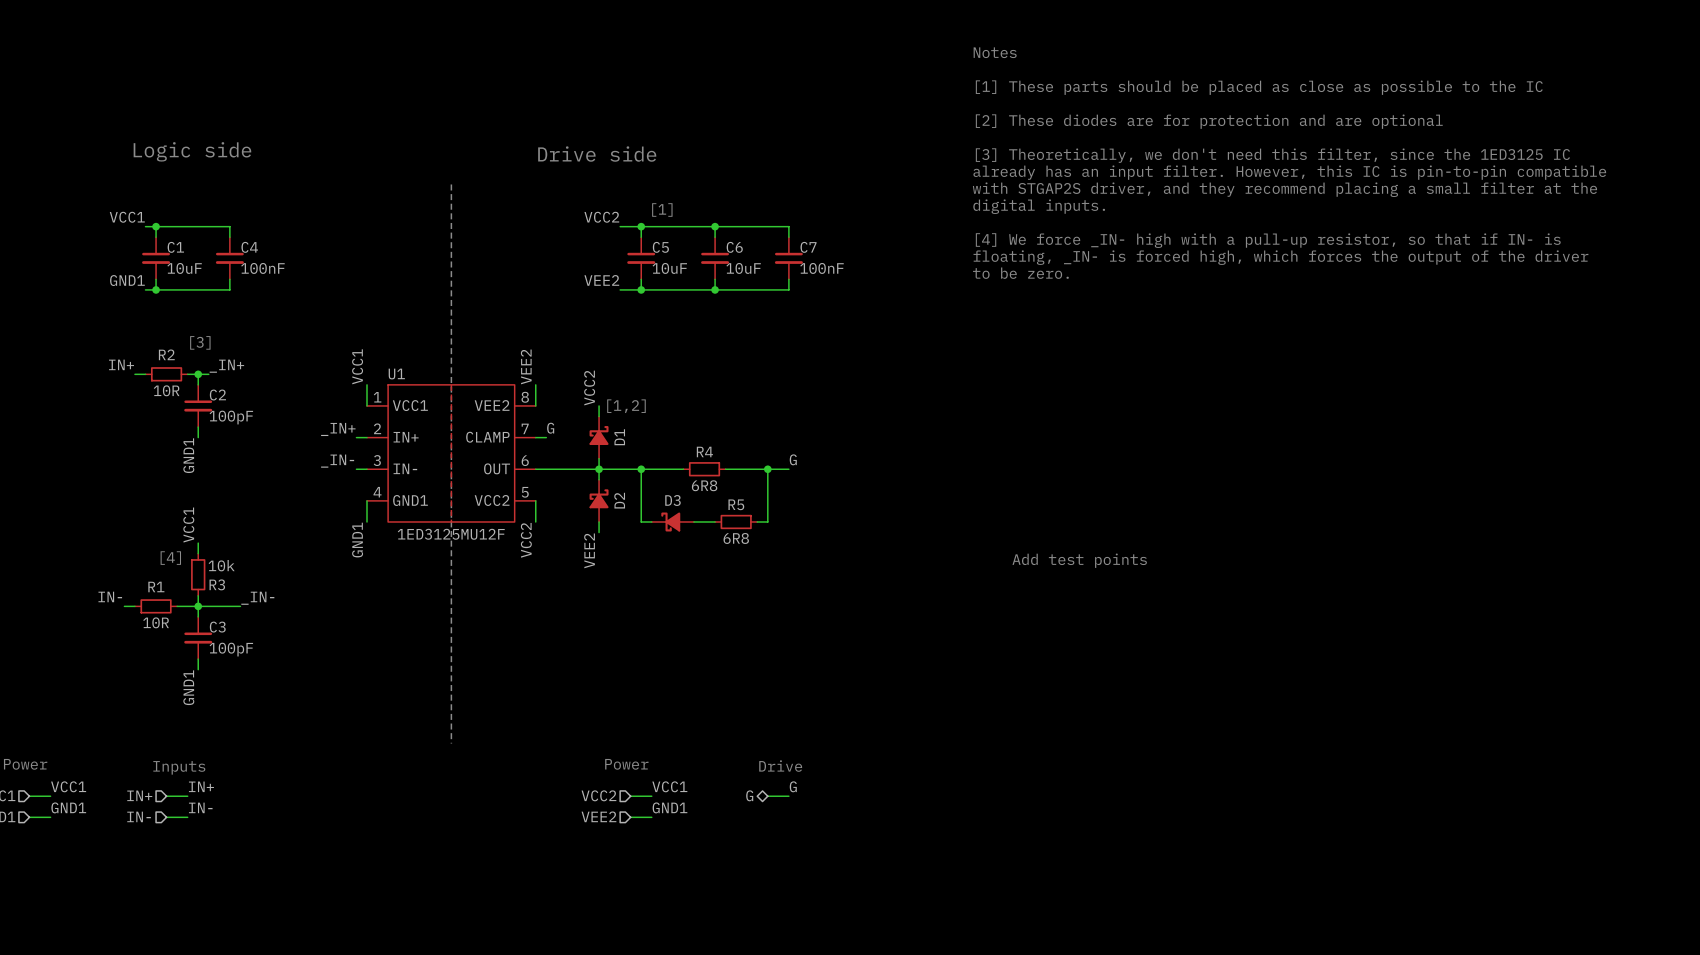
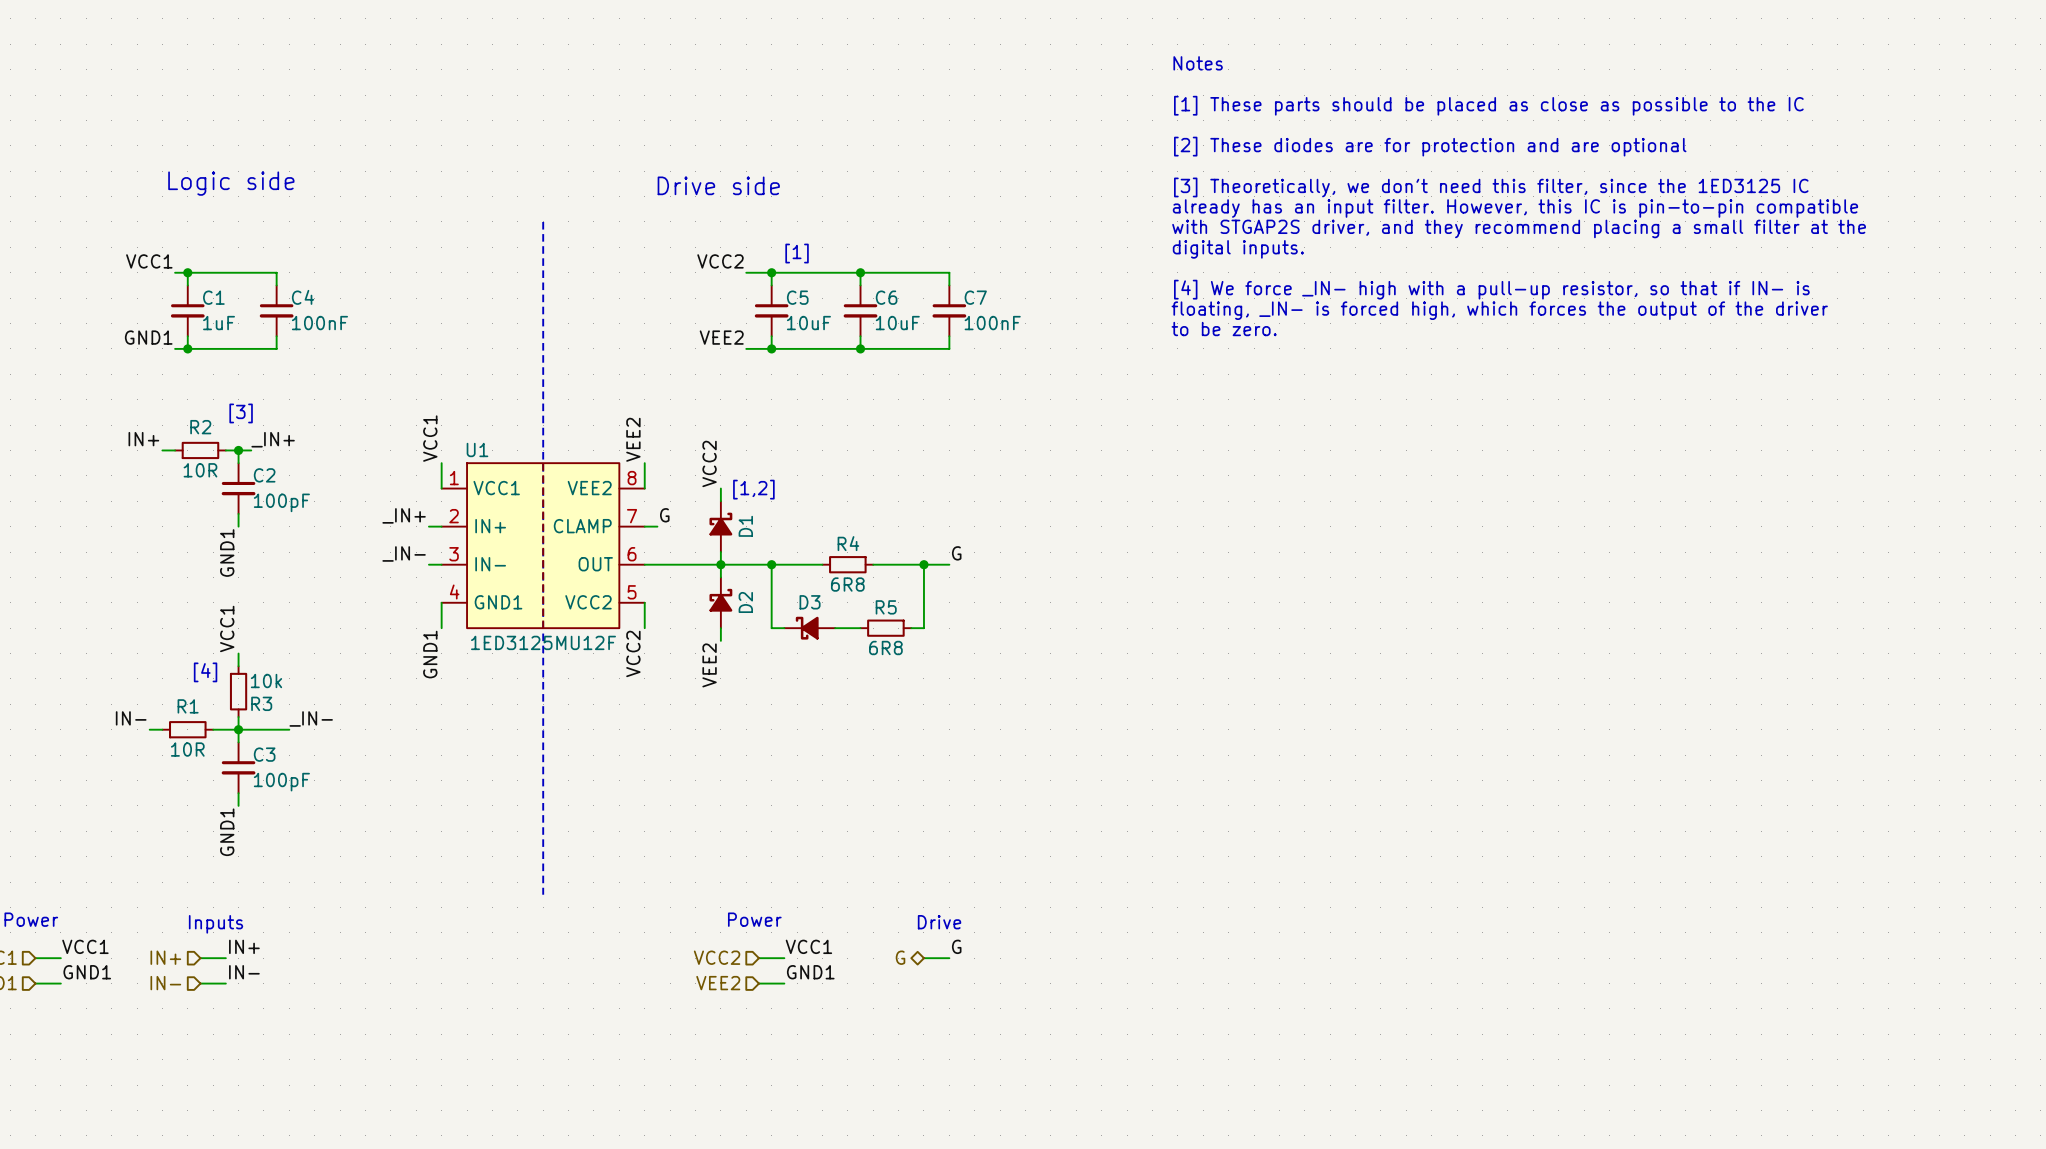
C1 value: 10uF (184, 268) -> 1uF (219, 323)
text: Add test points (1079, 560) -> none

